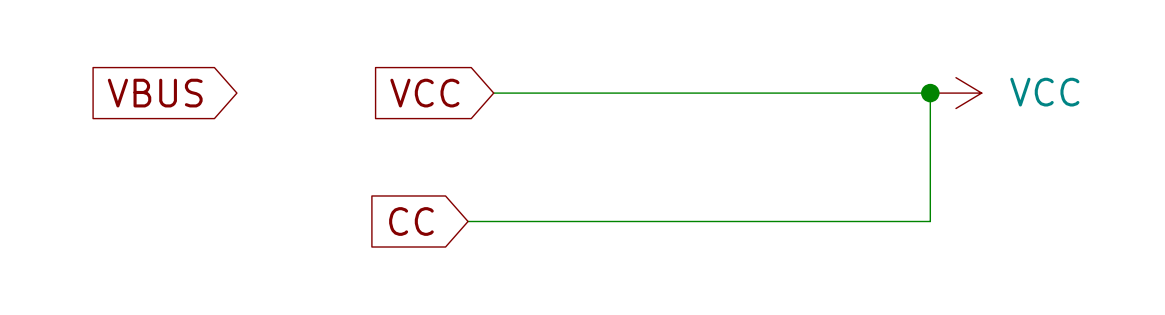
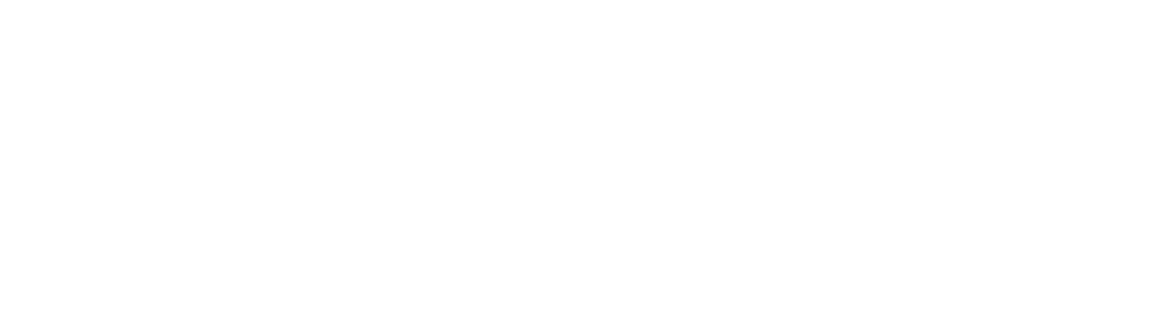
global label: VBUS (155, 93) -> none
global label: VCC (424, 93) -> none
wire: (493, 93) (930, 93) (930, 221) (468, 221) -> none
junction: (930, 93) -> none
power symbol: VCC (955, 93) -> none
global label: CC (411, 221) -> none

